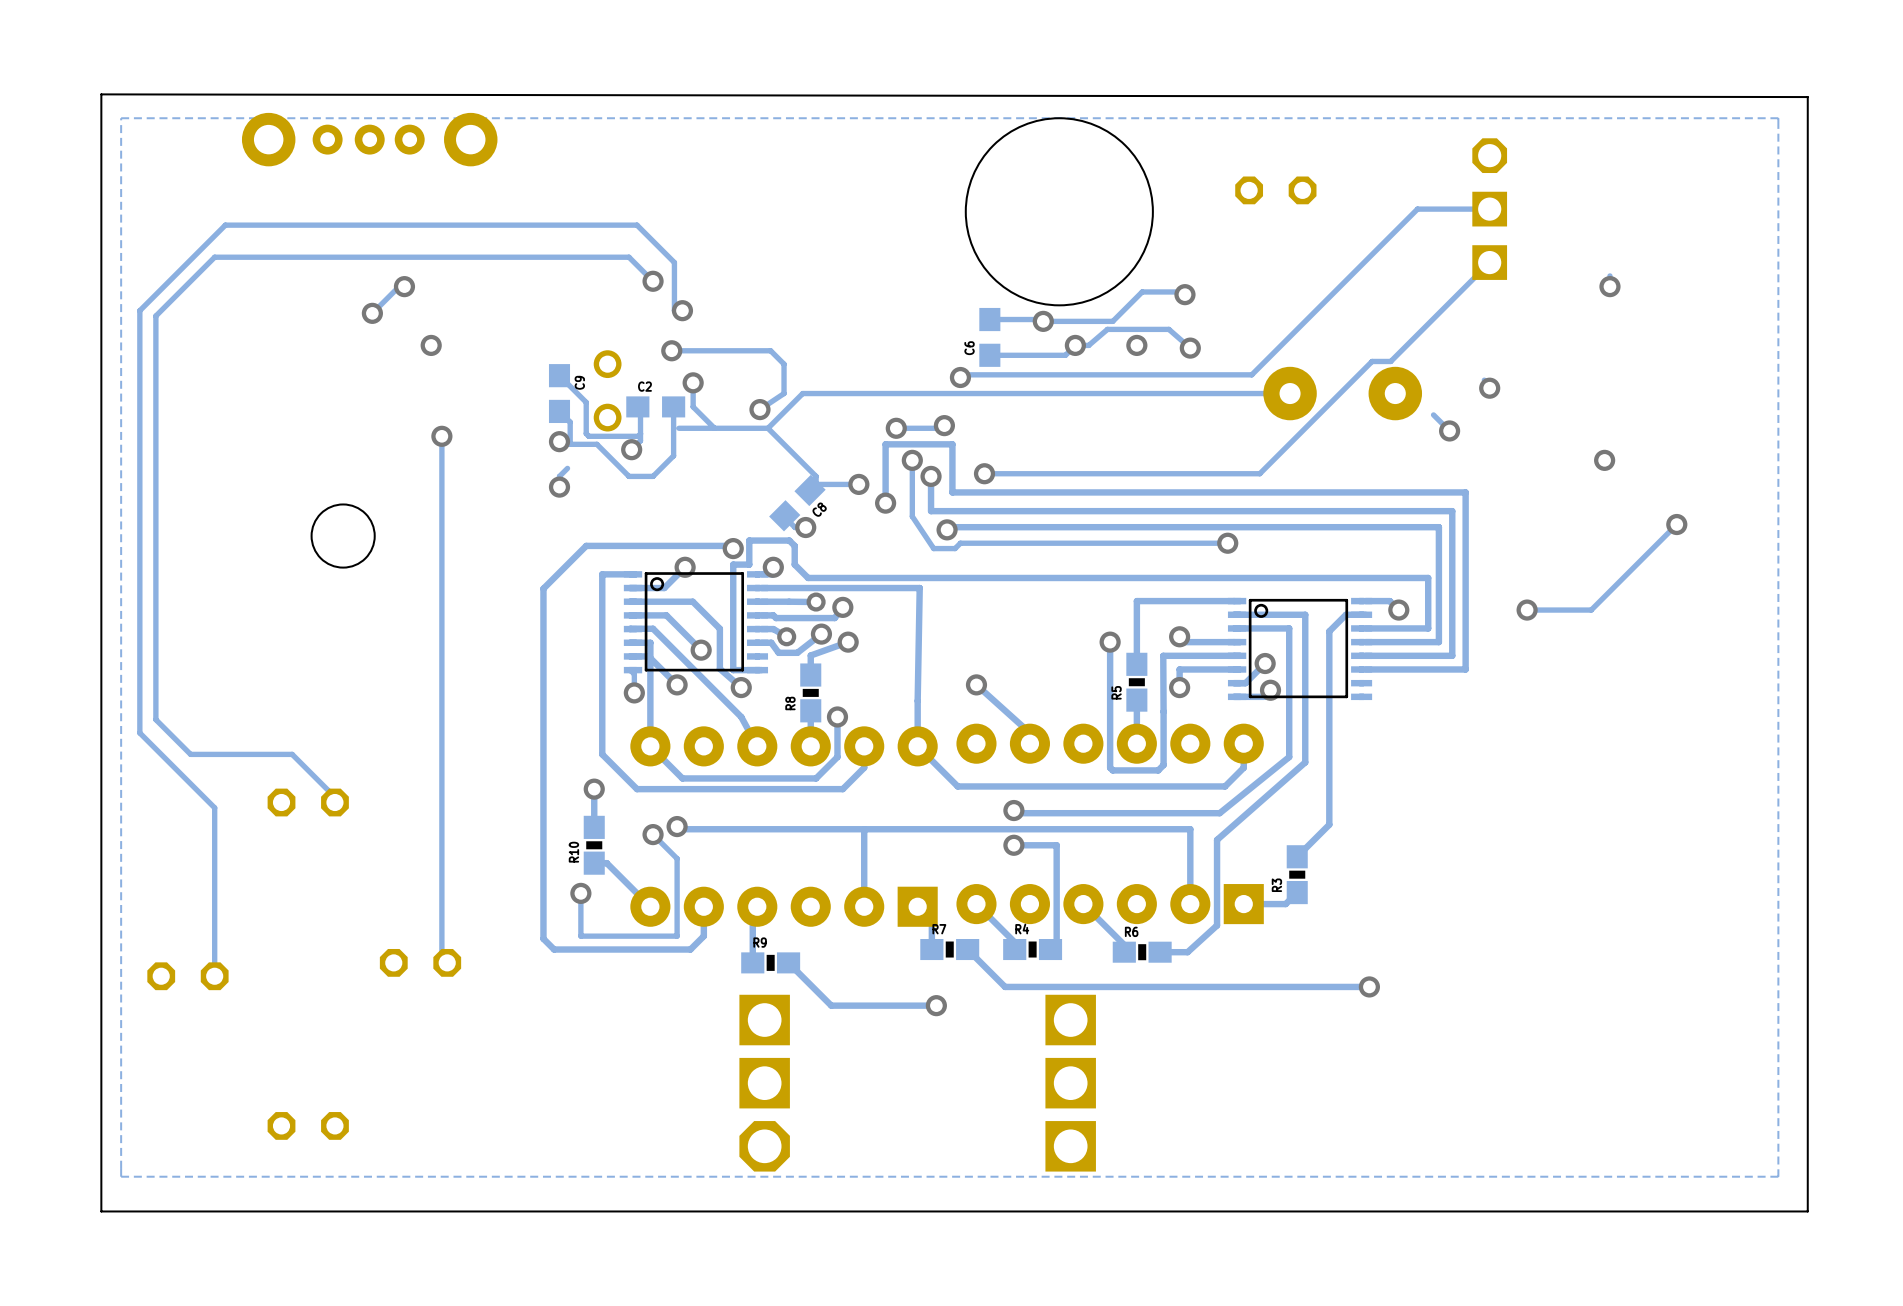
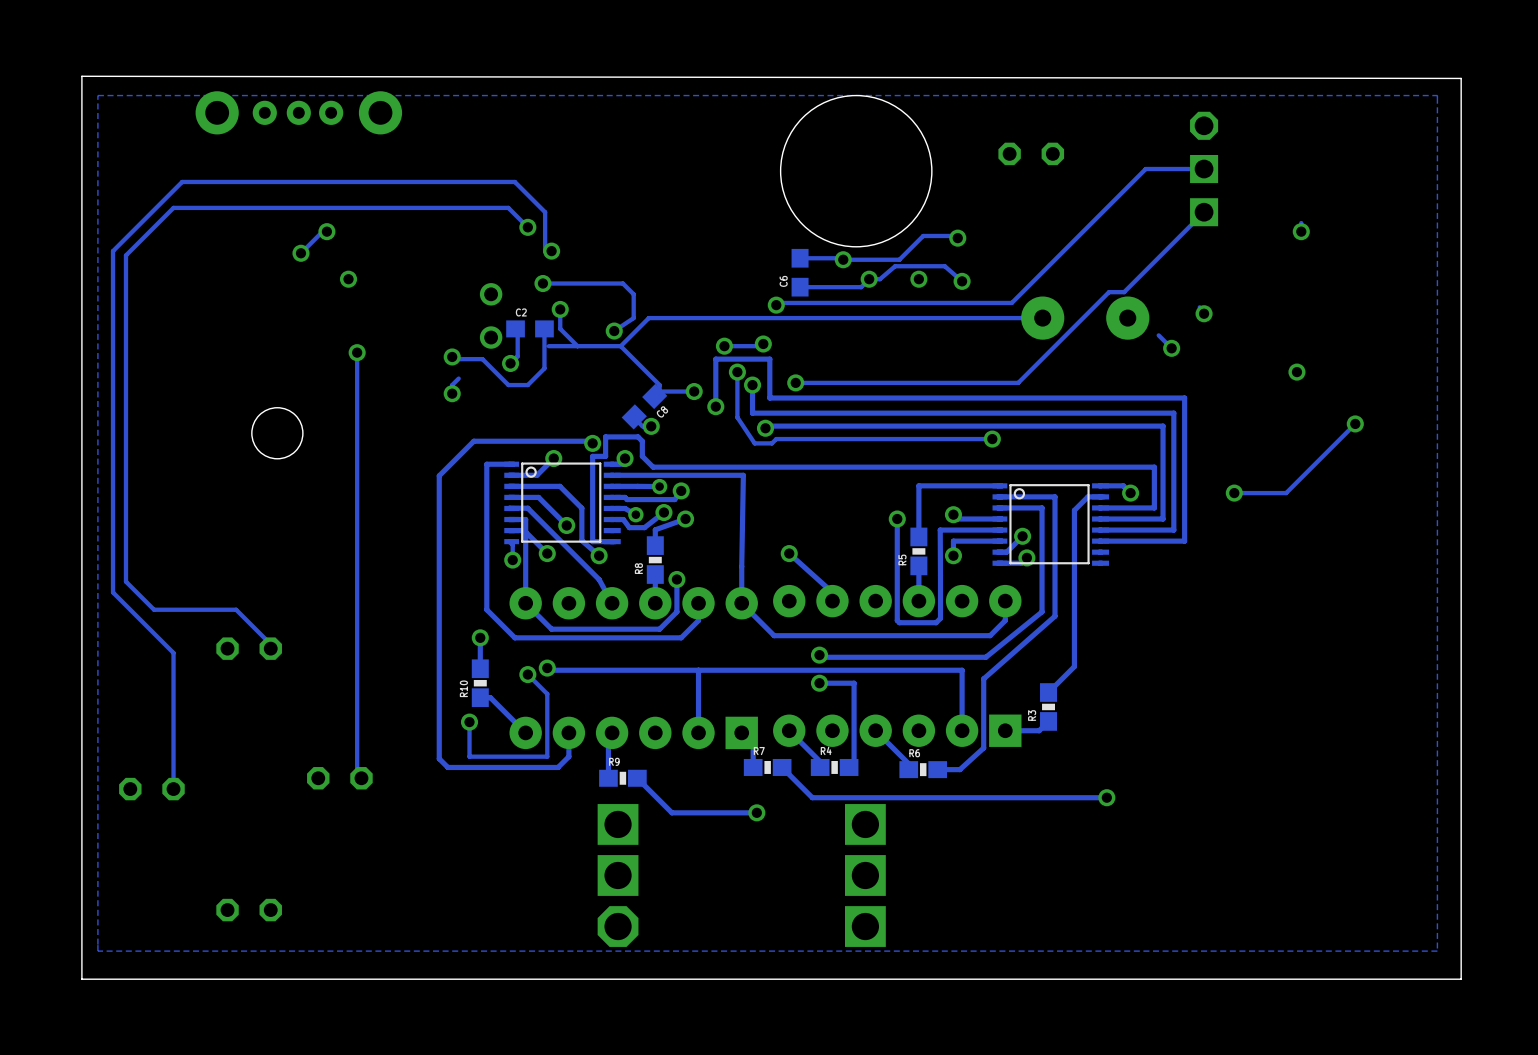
track: (559, 375) (586, 402) (586, 433) (588, 436) (637, 436) (640, 433) -> none
C9: (559, 393) -> none
track: (559, 411) (570, 422) (570, 444) -> none

